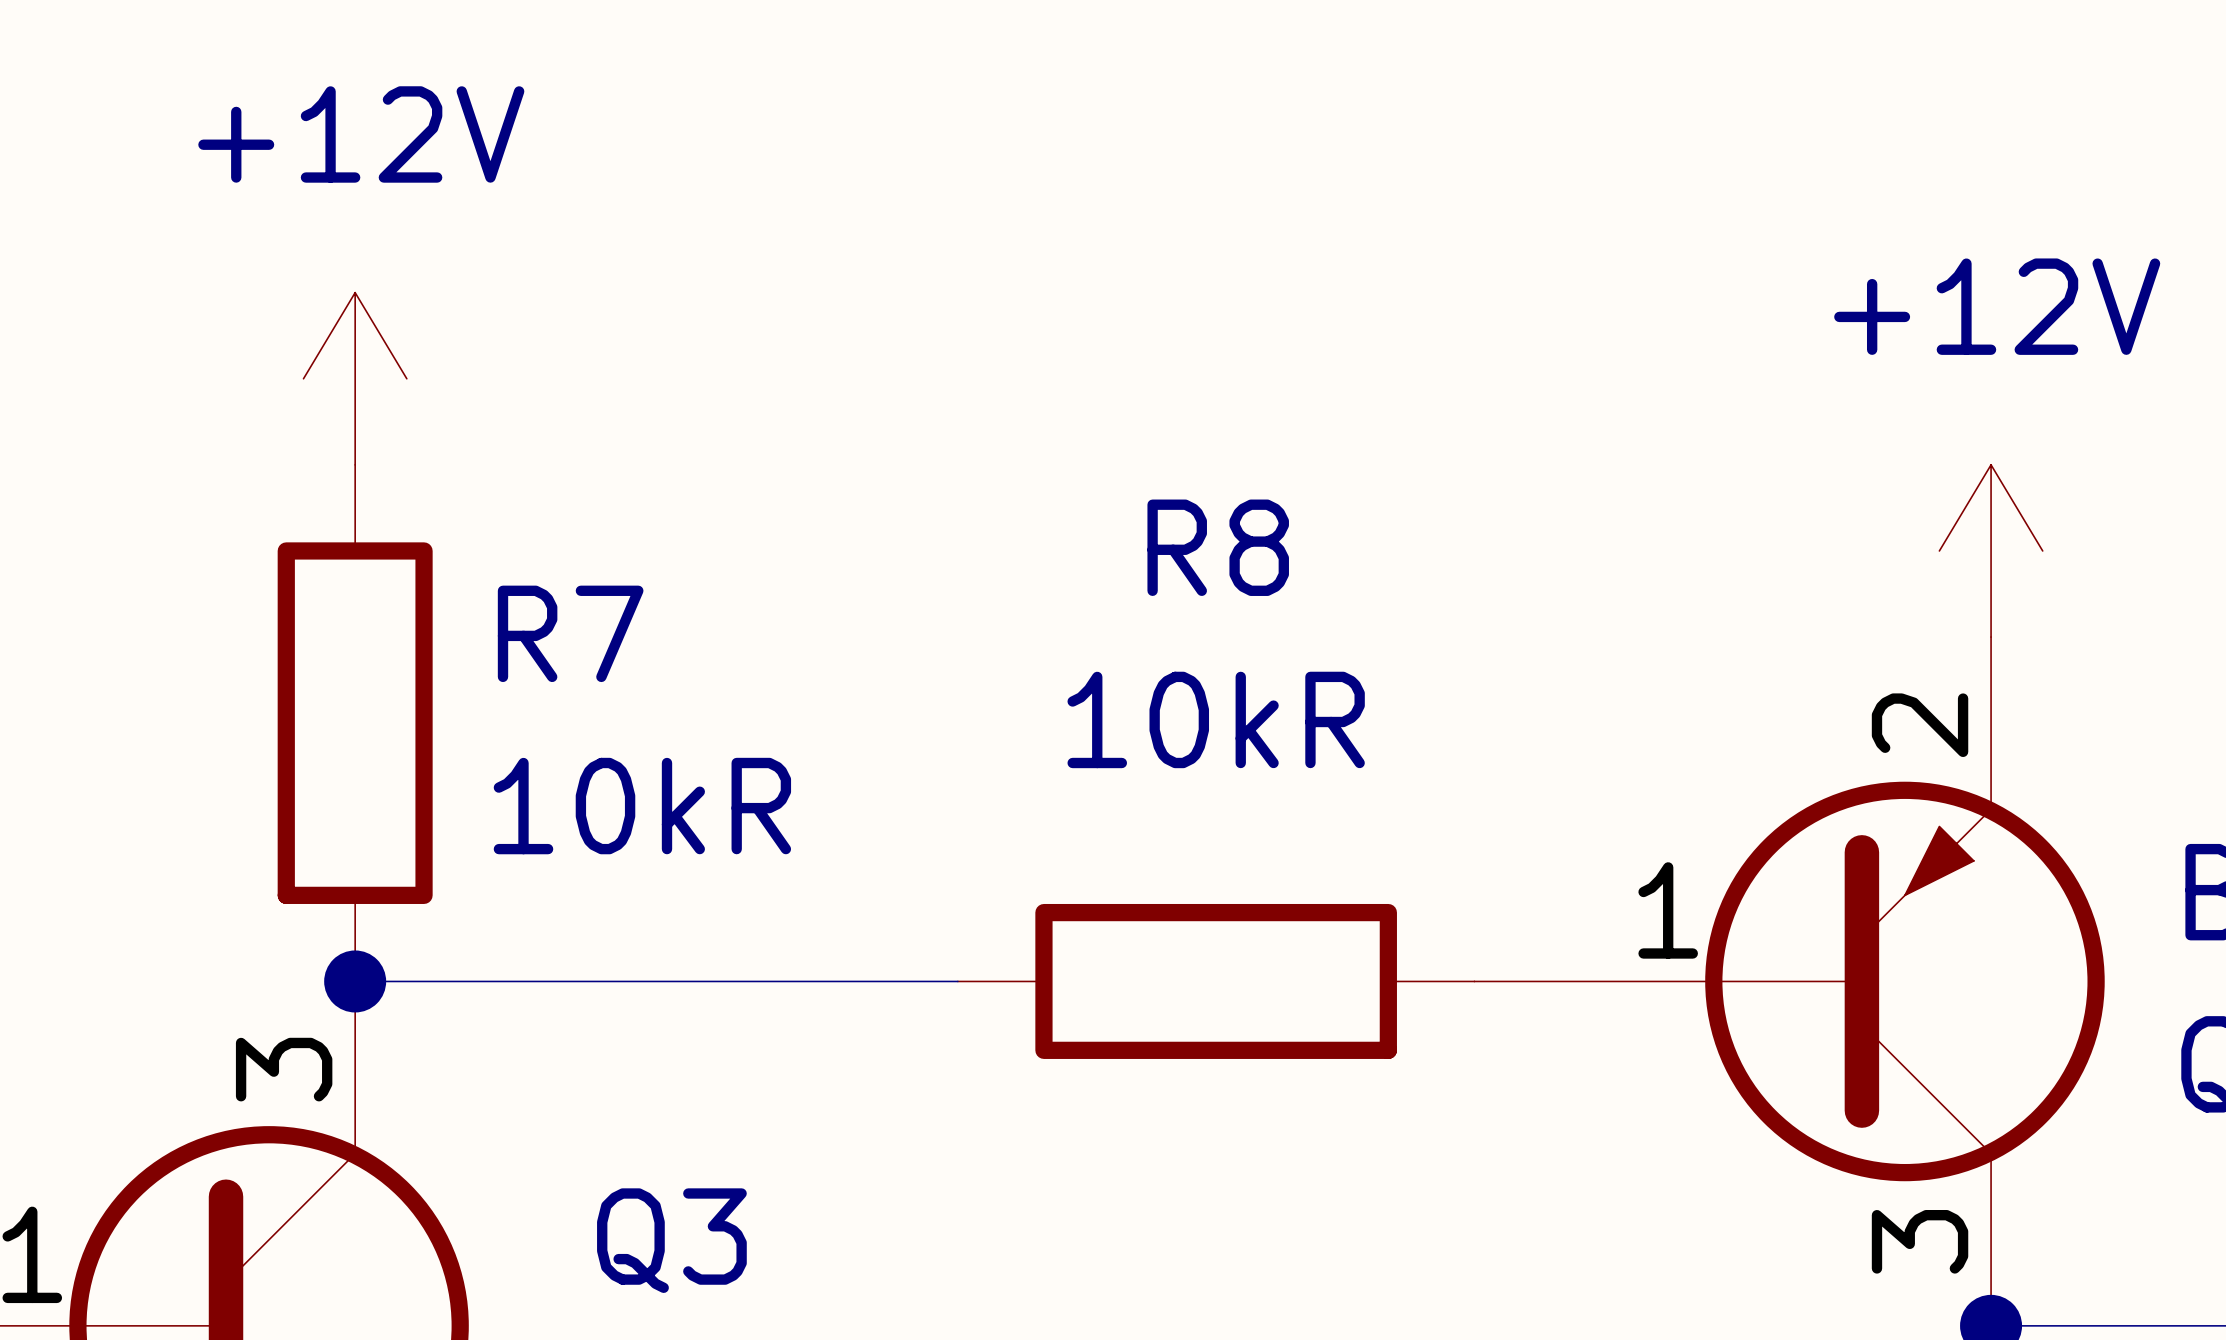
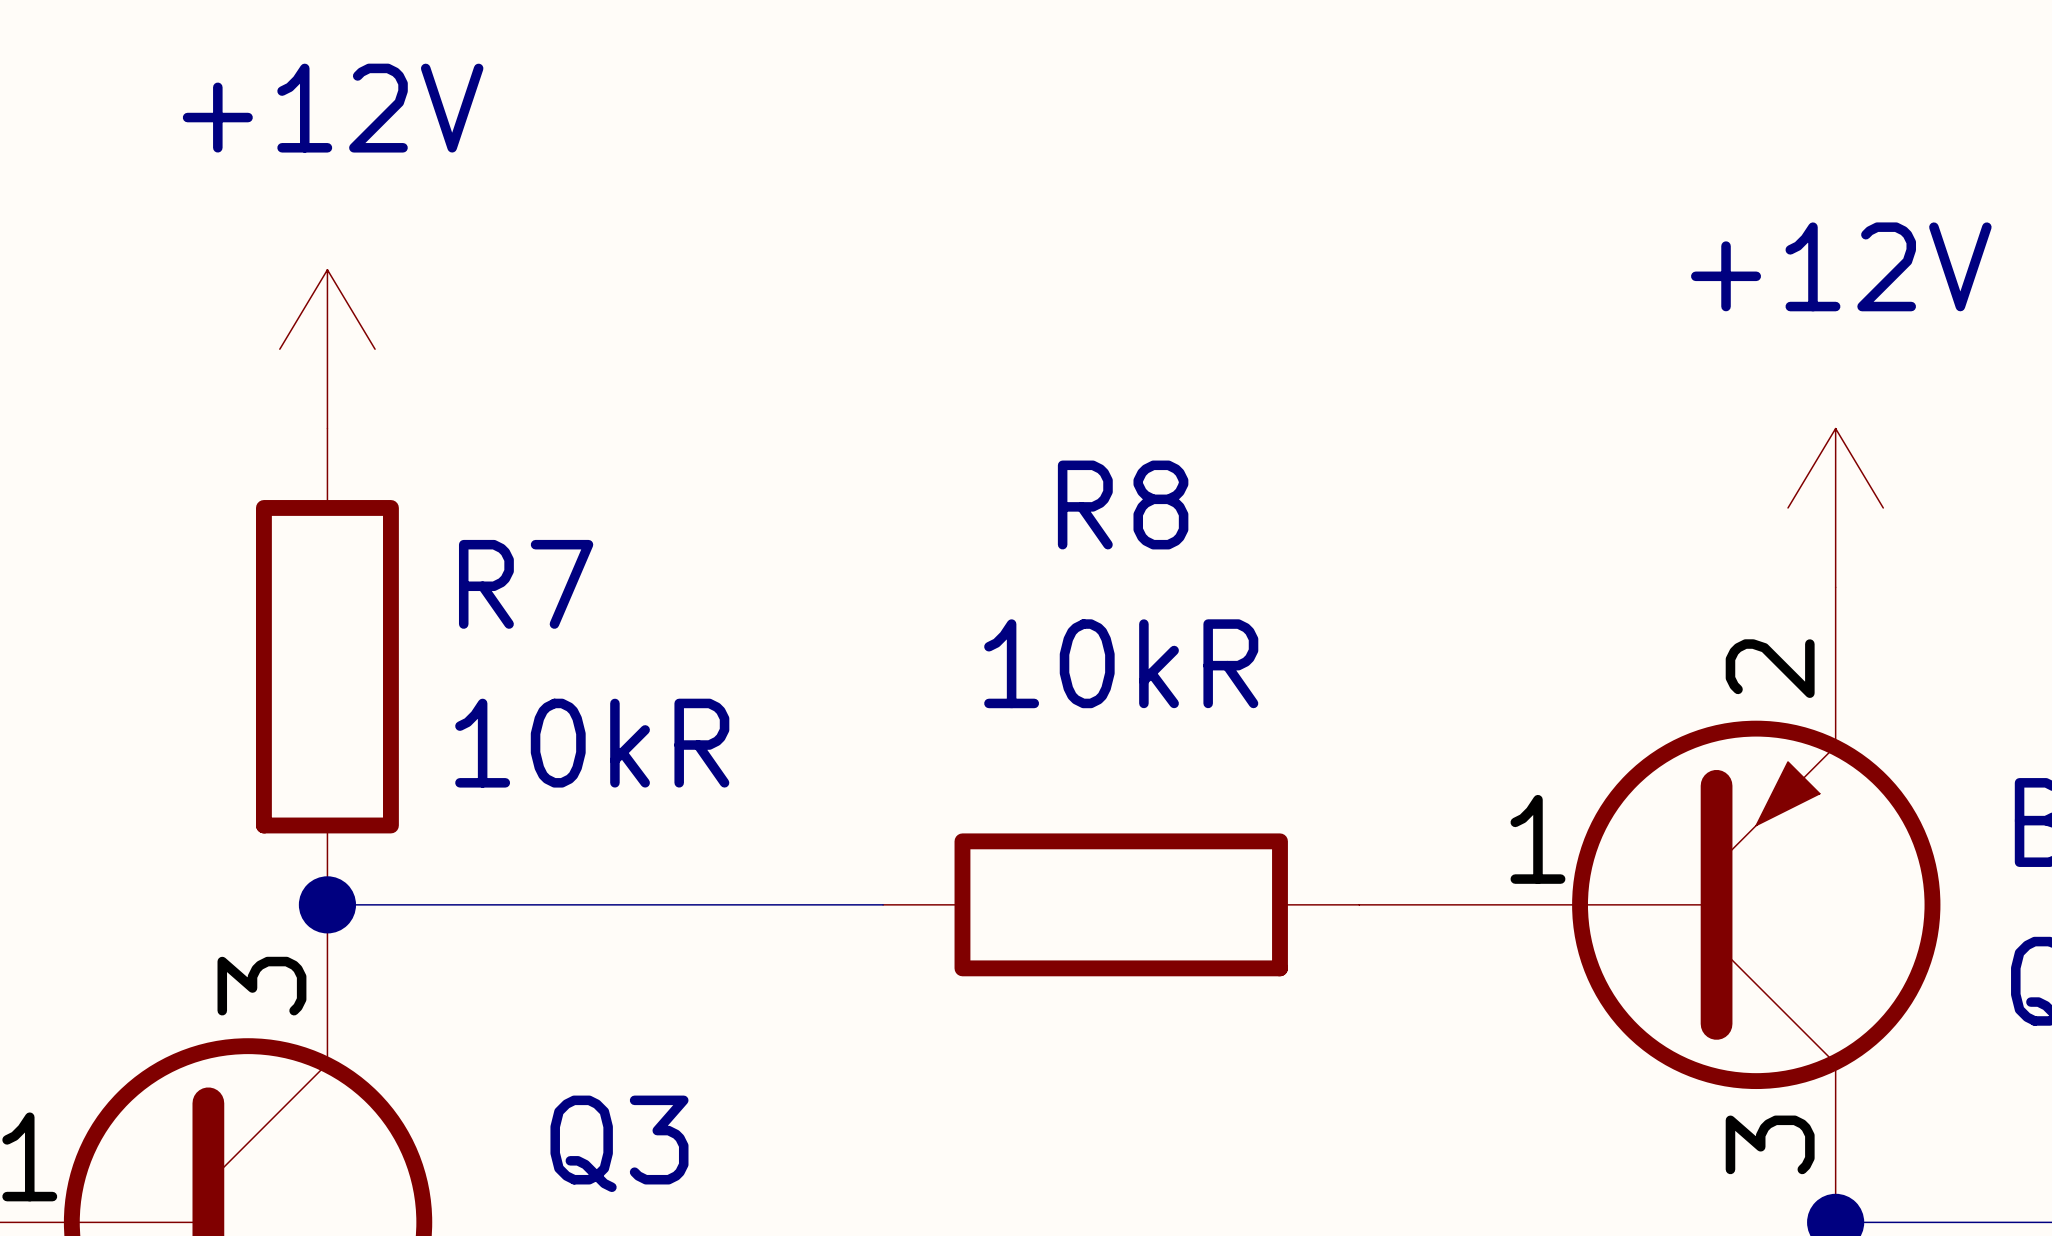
power symbol text position: +12V (361, 134) -> +12V (333, 108)
power symbol text position: +12V (1997, 306) -> +12V (1841, 266)

